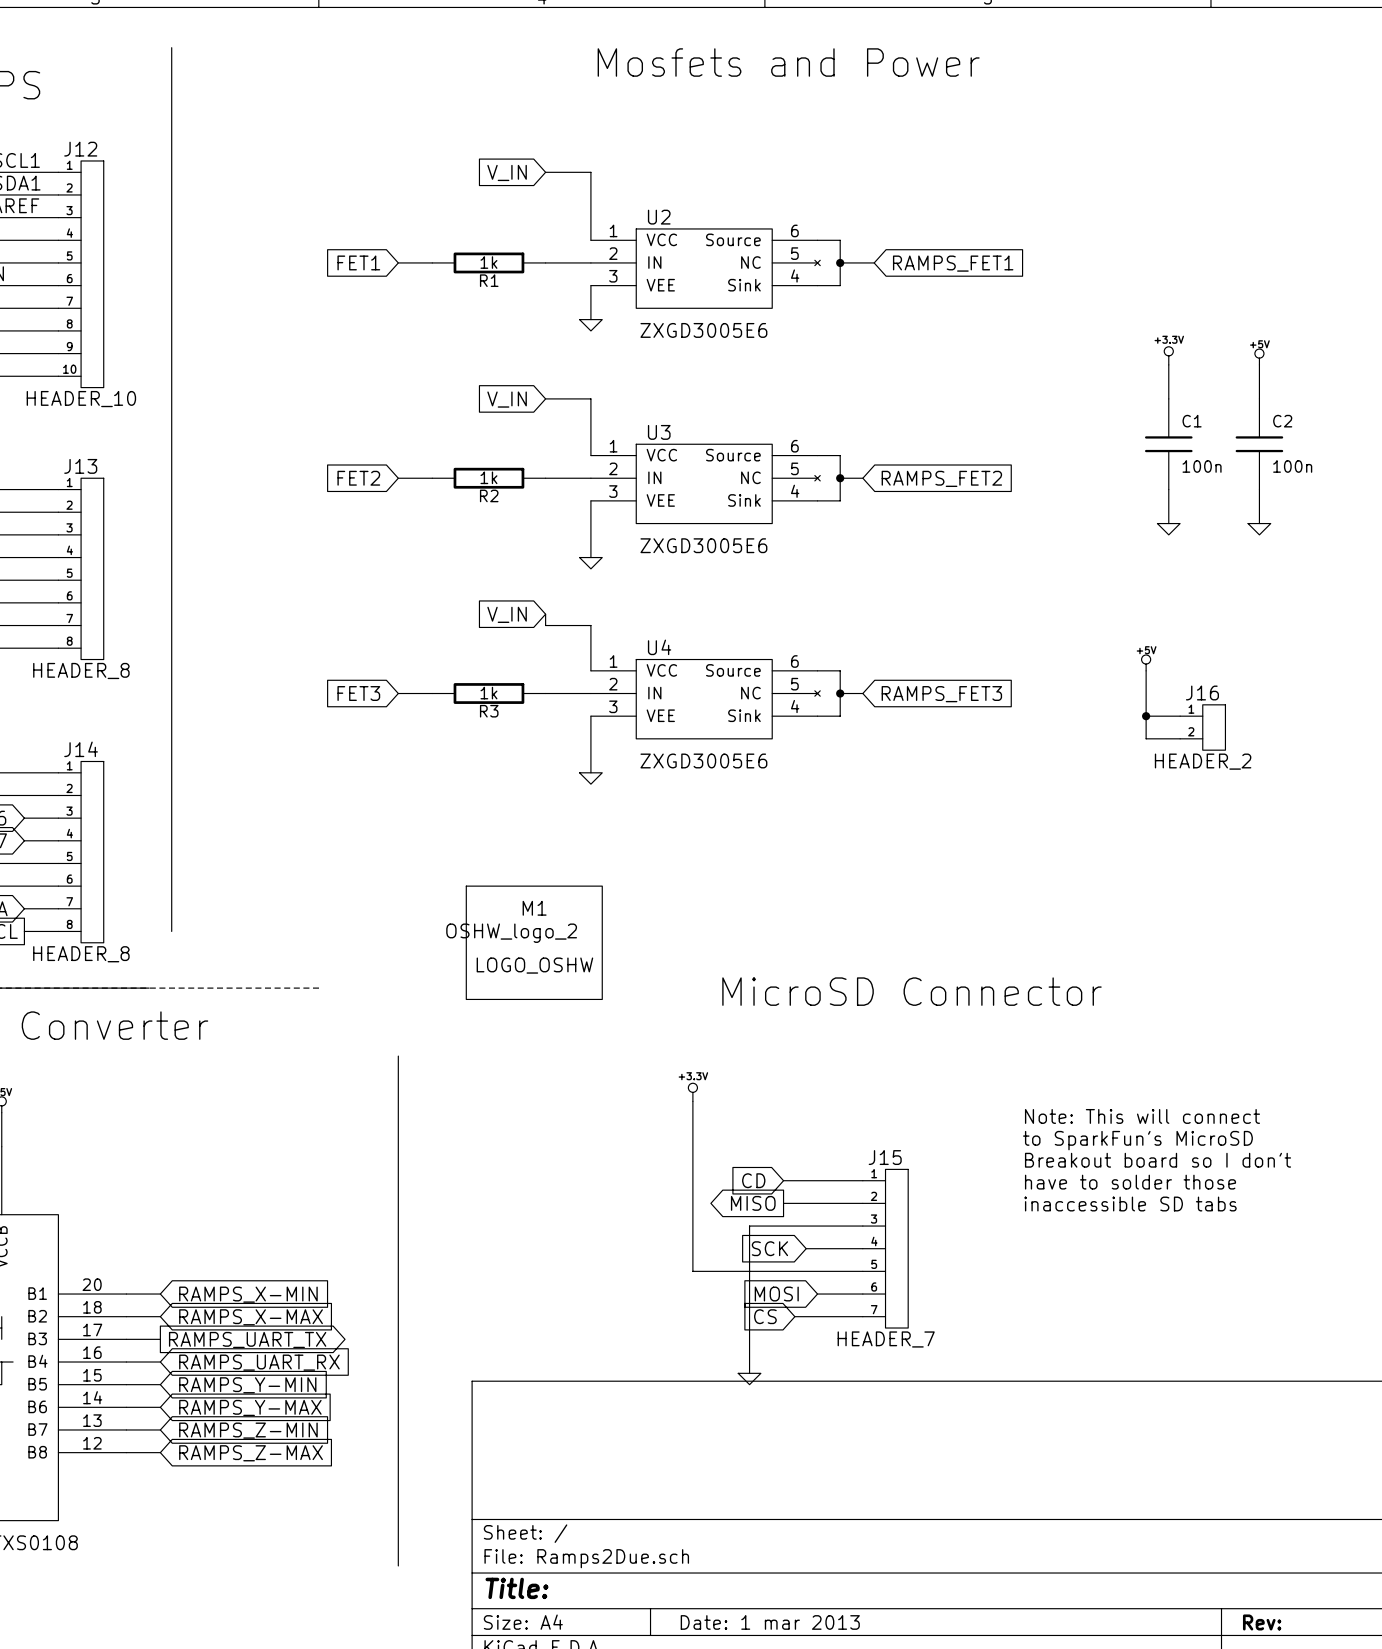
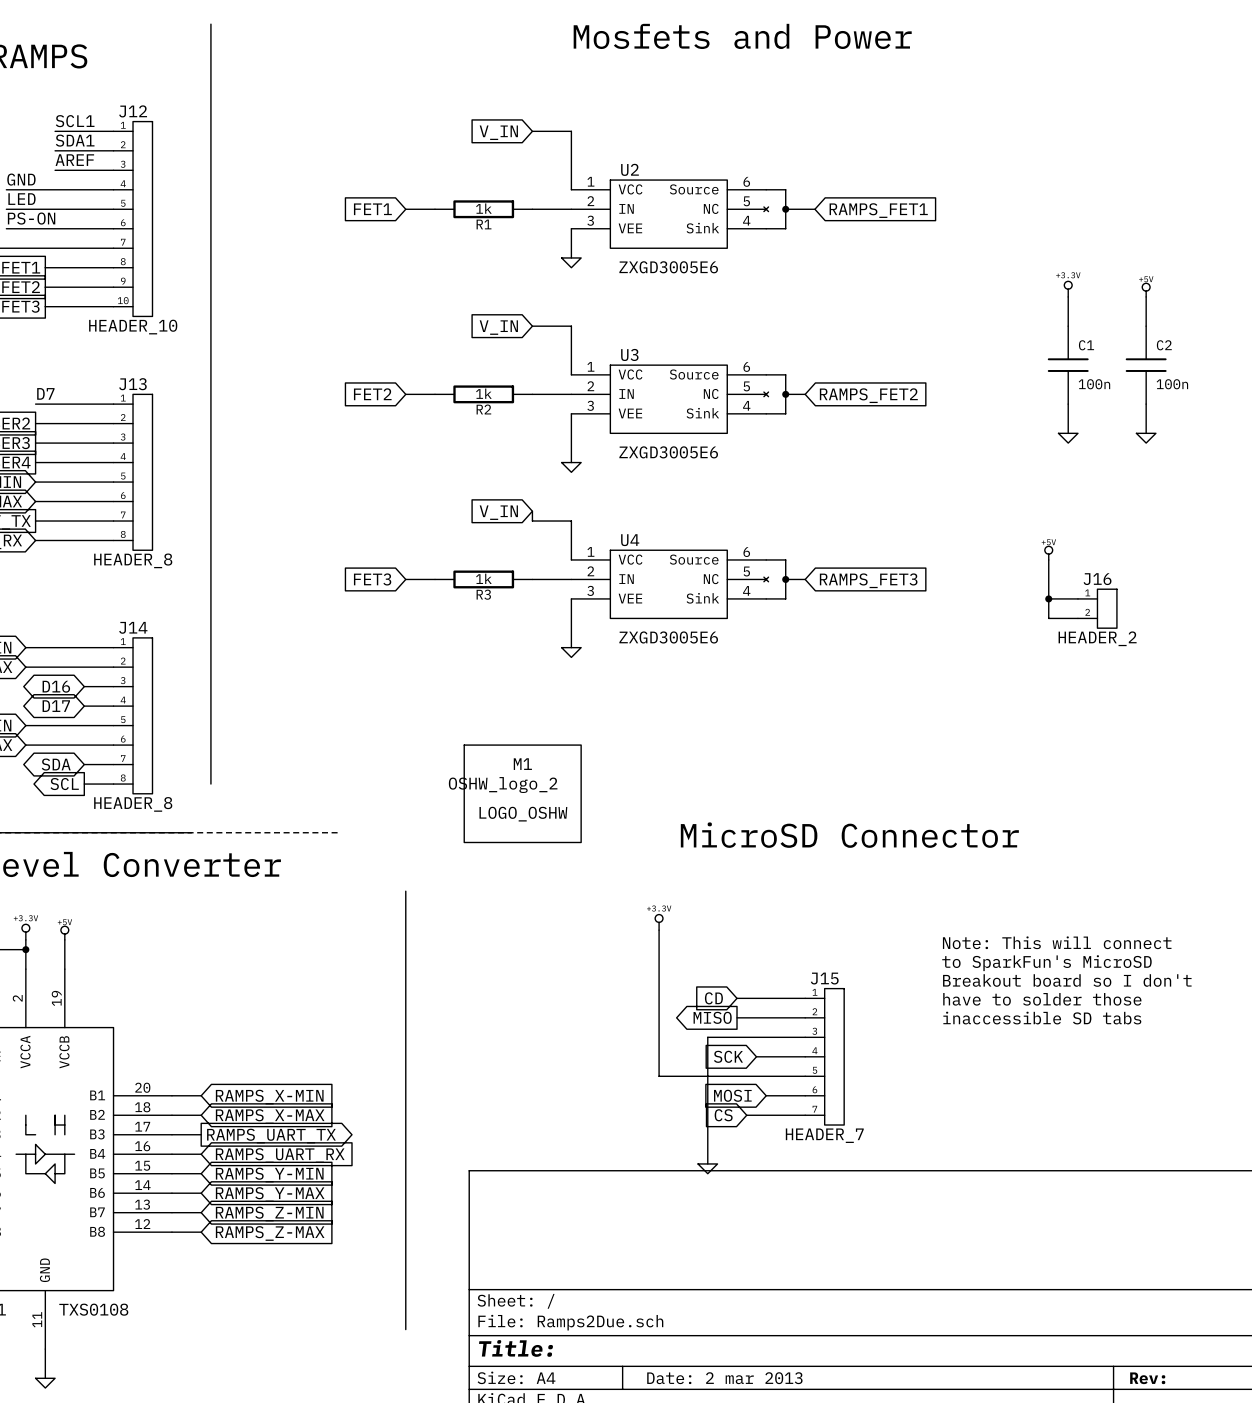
title block: Date: 1 mar 2013 (770, 1622) -> Date: 2 mar 2013 (724, 1378)

